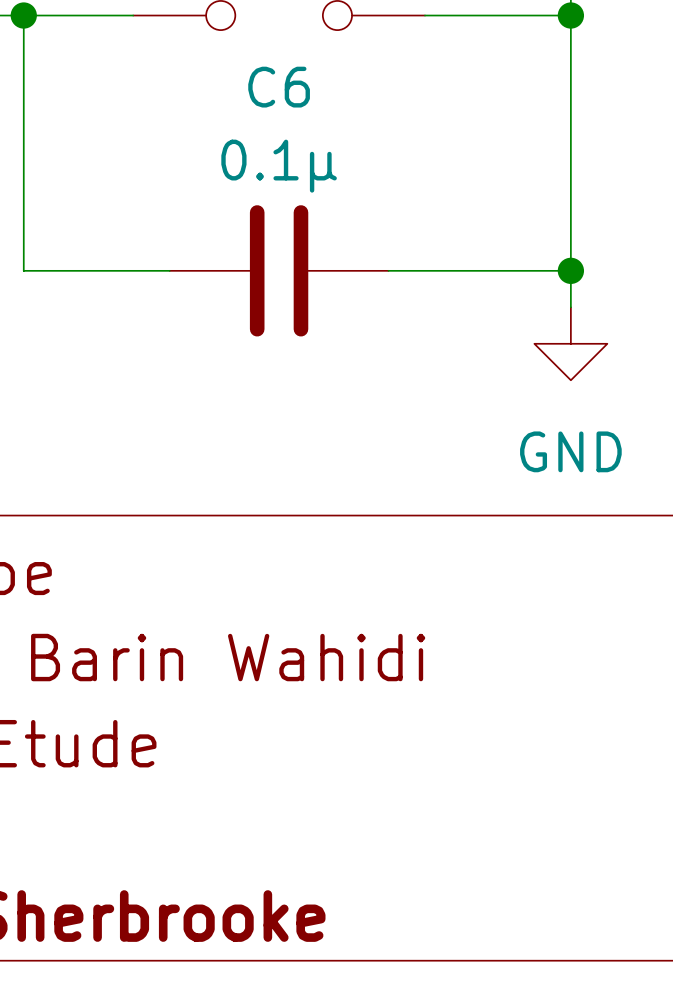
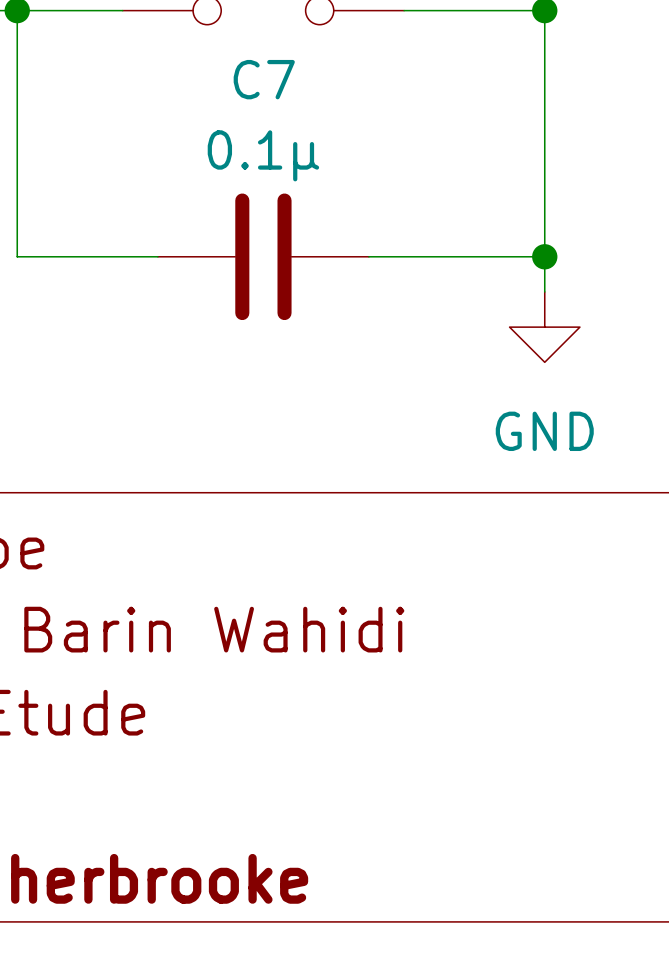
C6 name: C6 (279, 87) -> C7 (264, 79)

